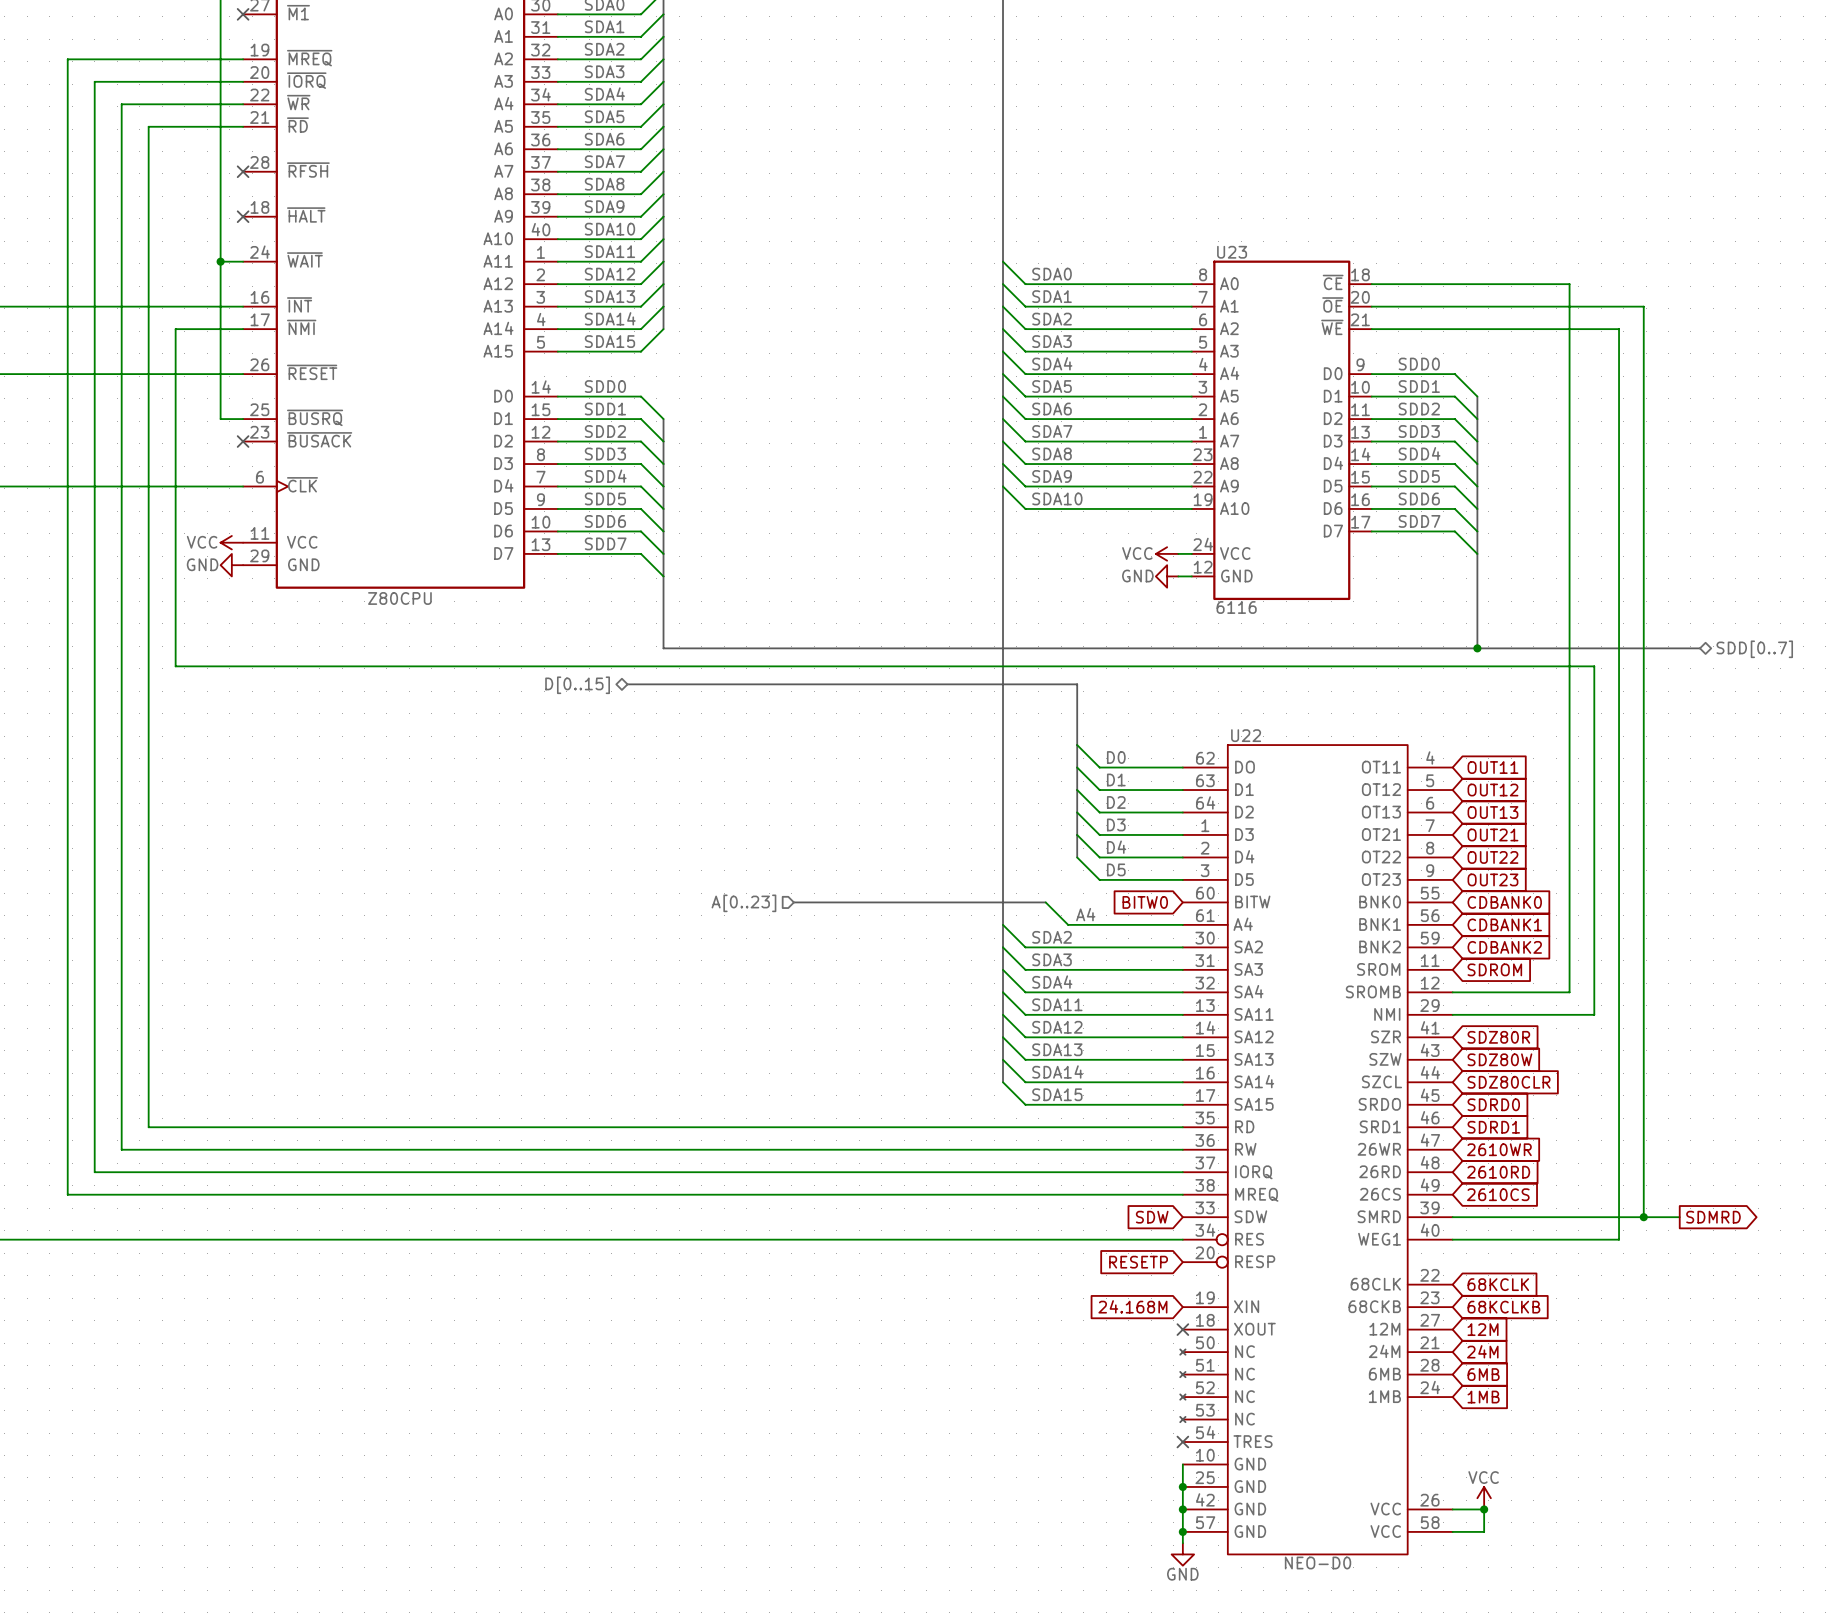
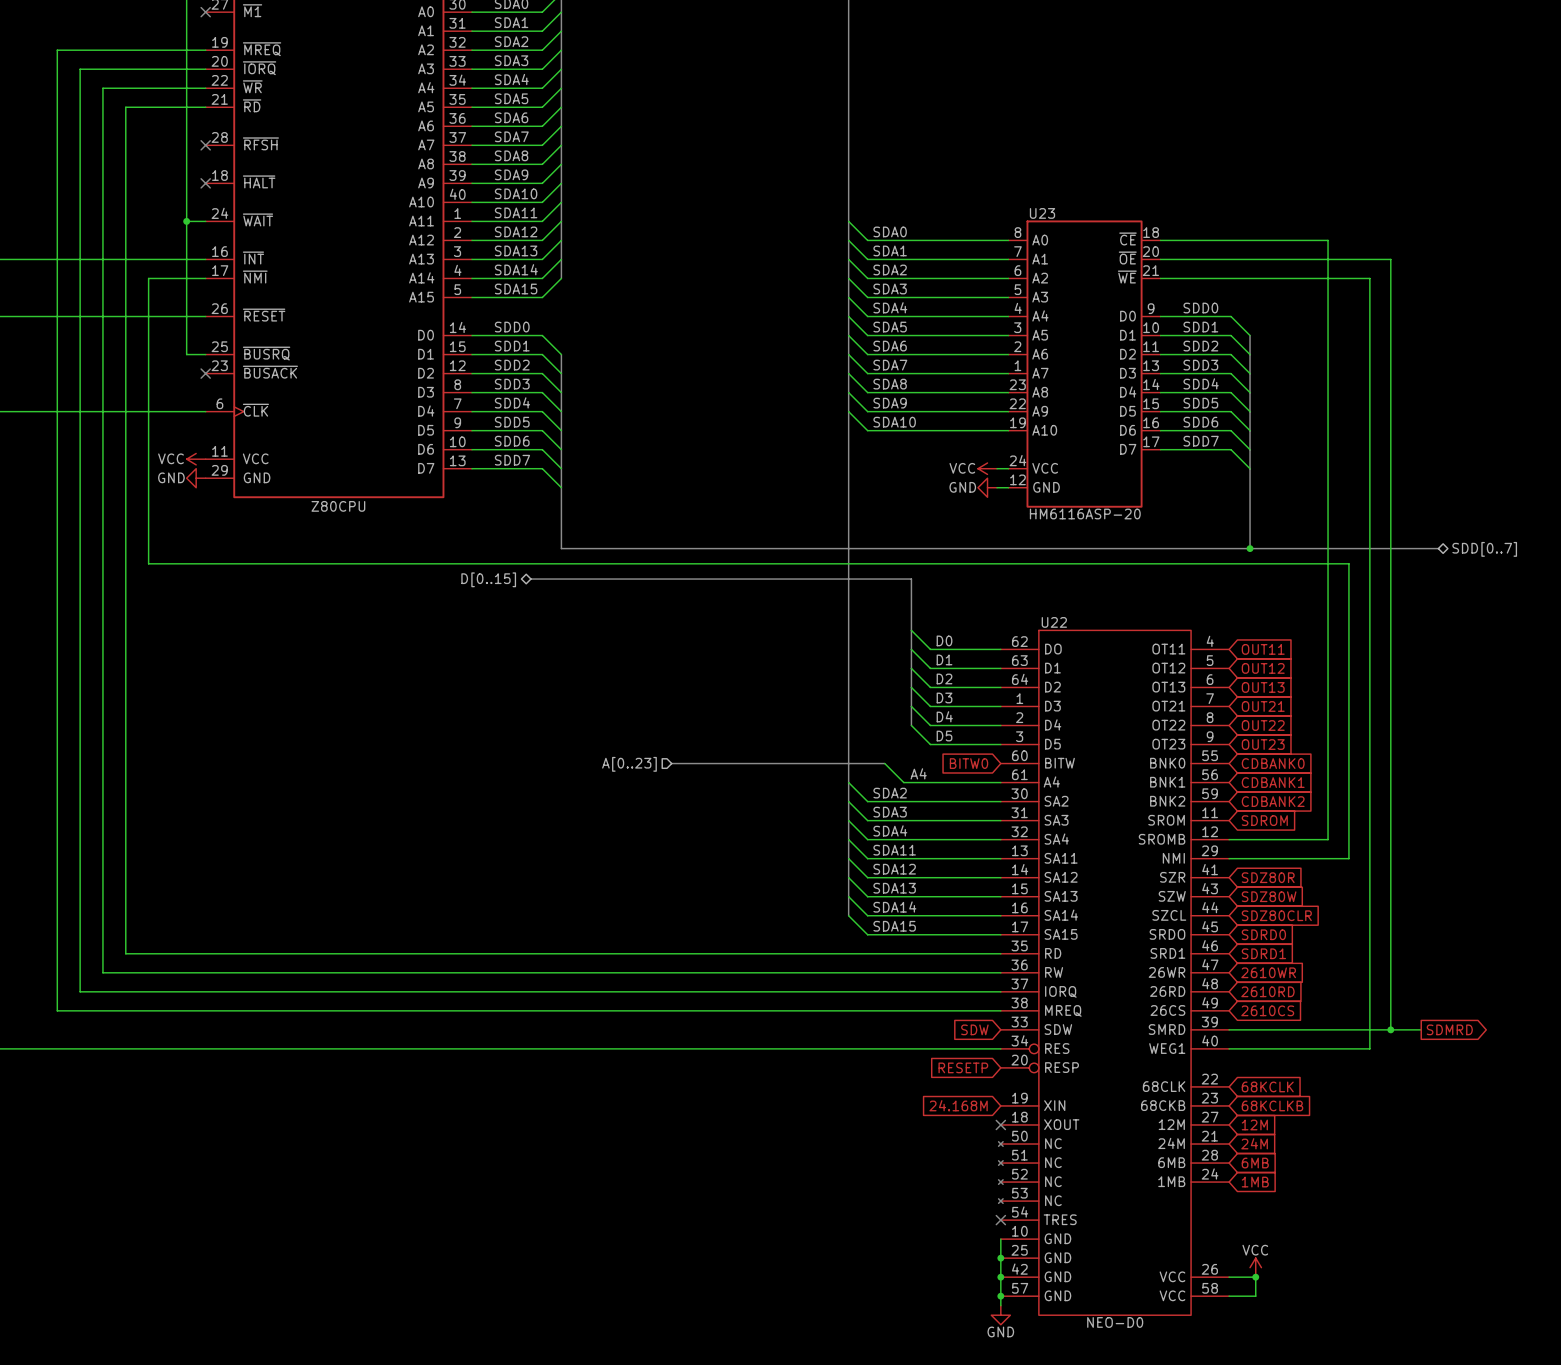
U23 value: 6116 (1236, 607) -> HM6116ASP-20 (1085, 514)

